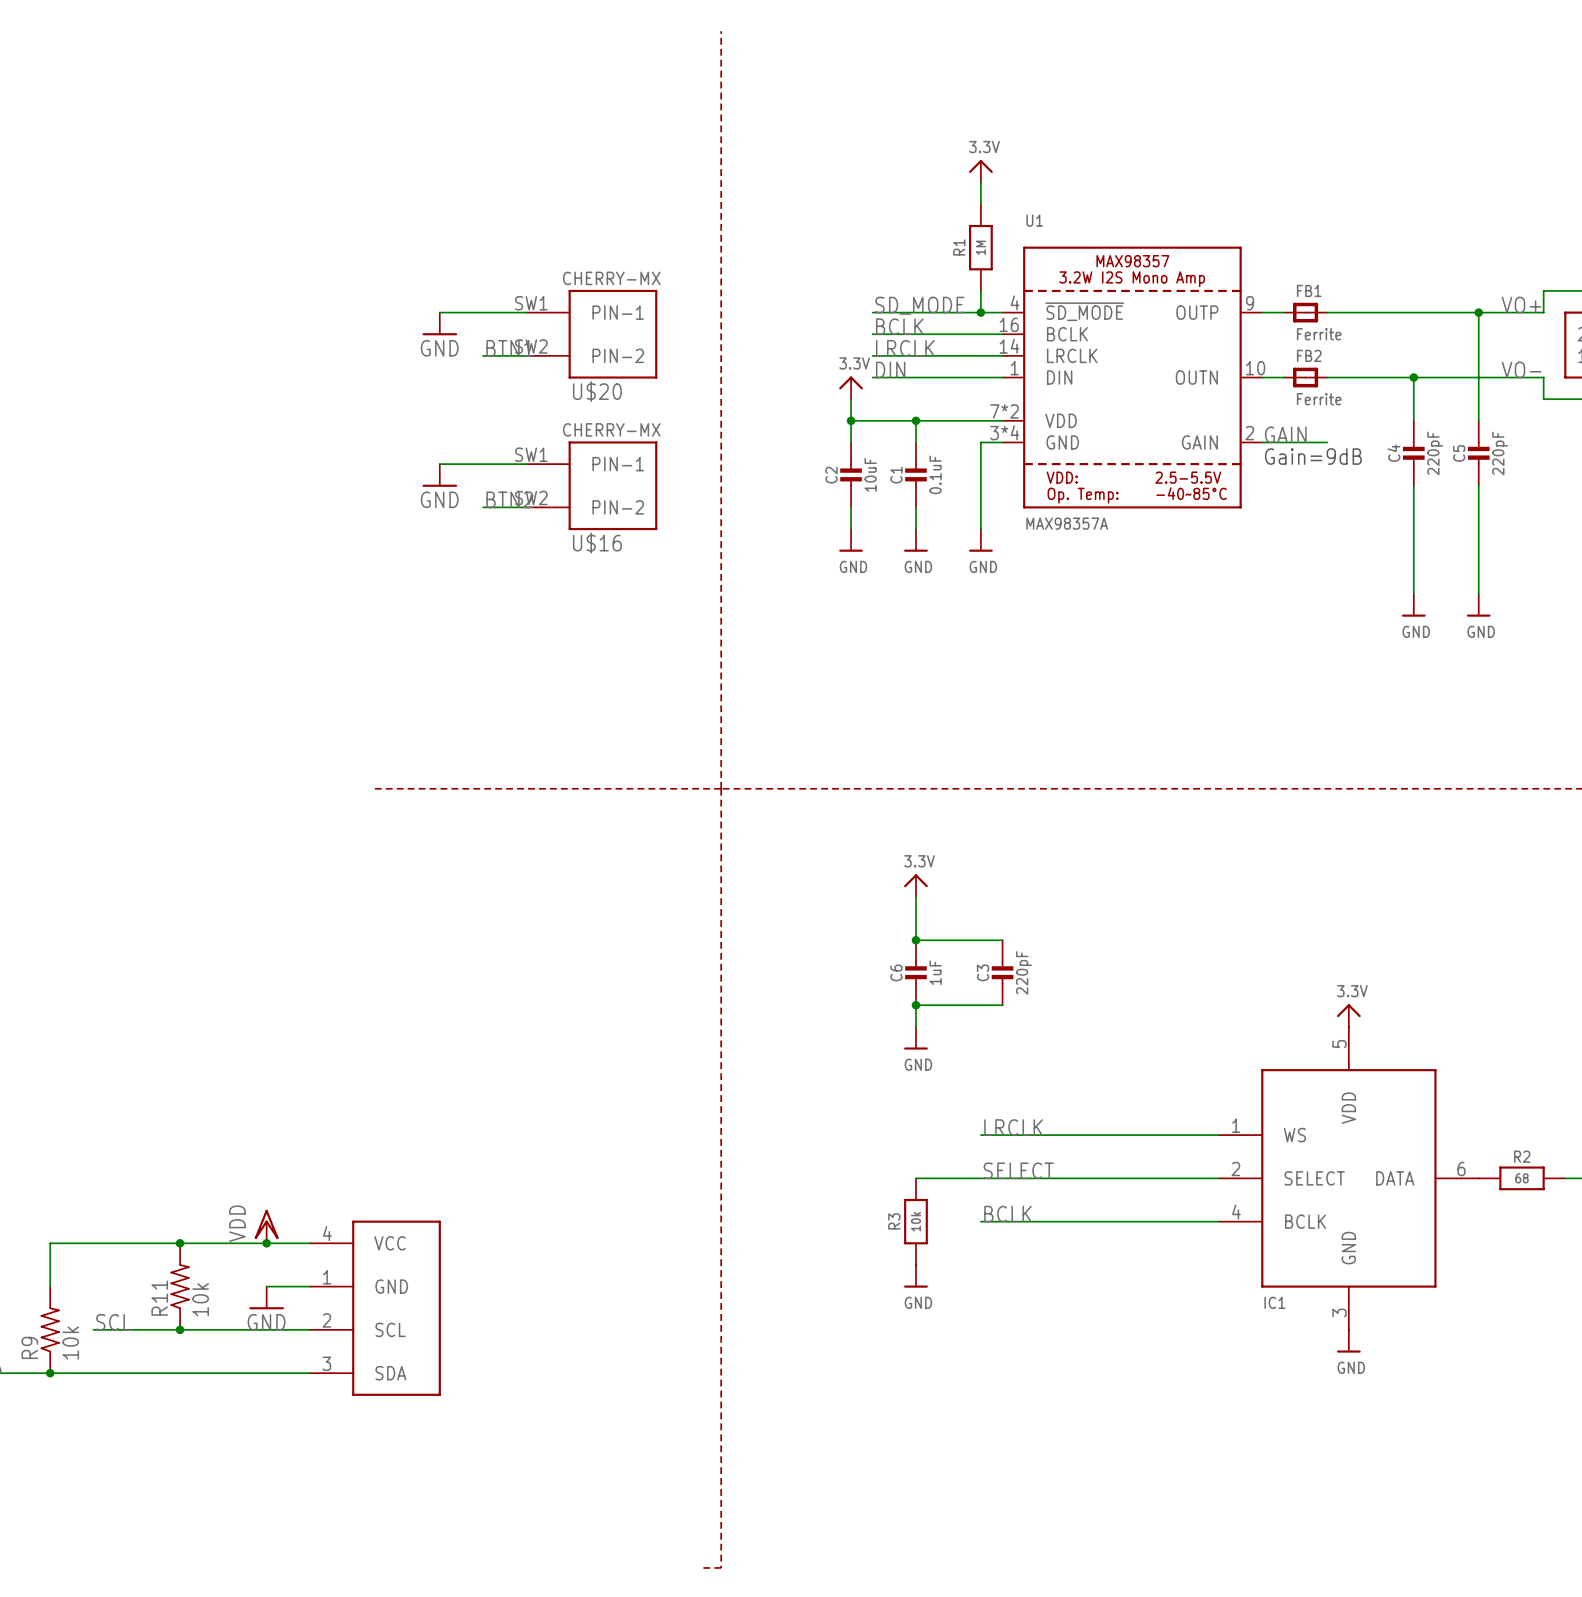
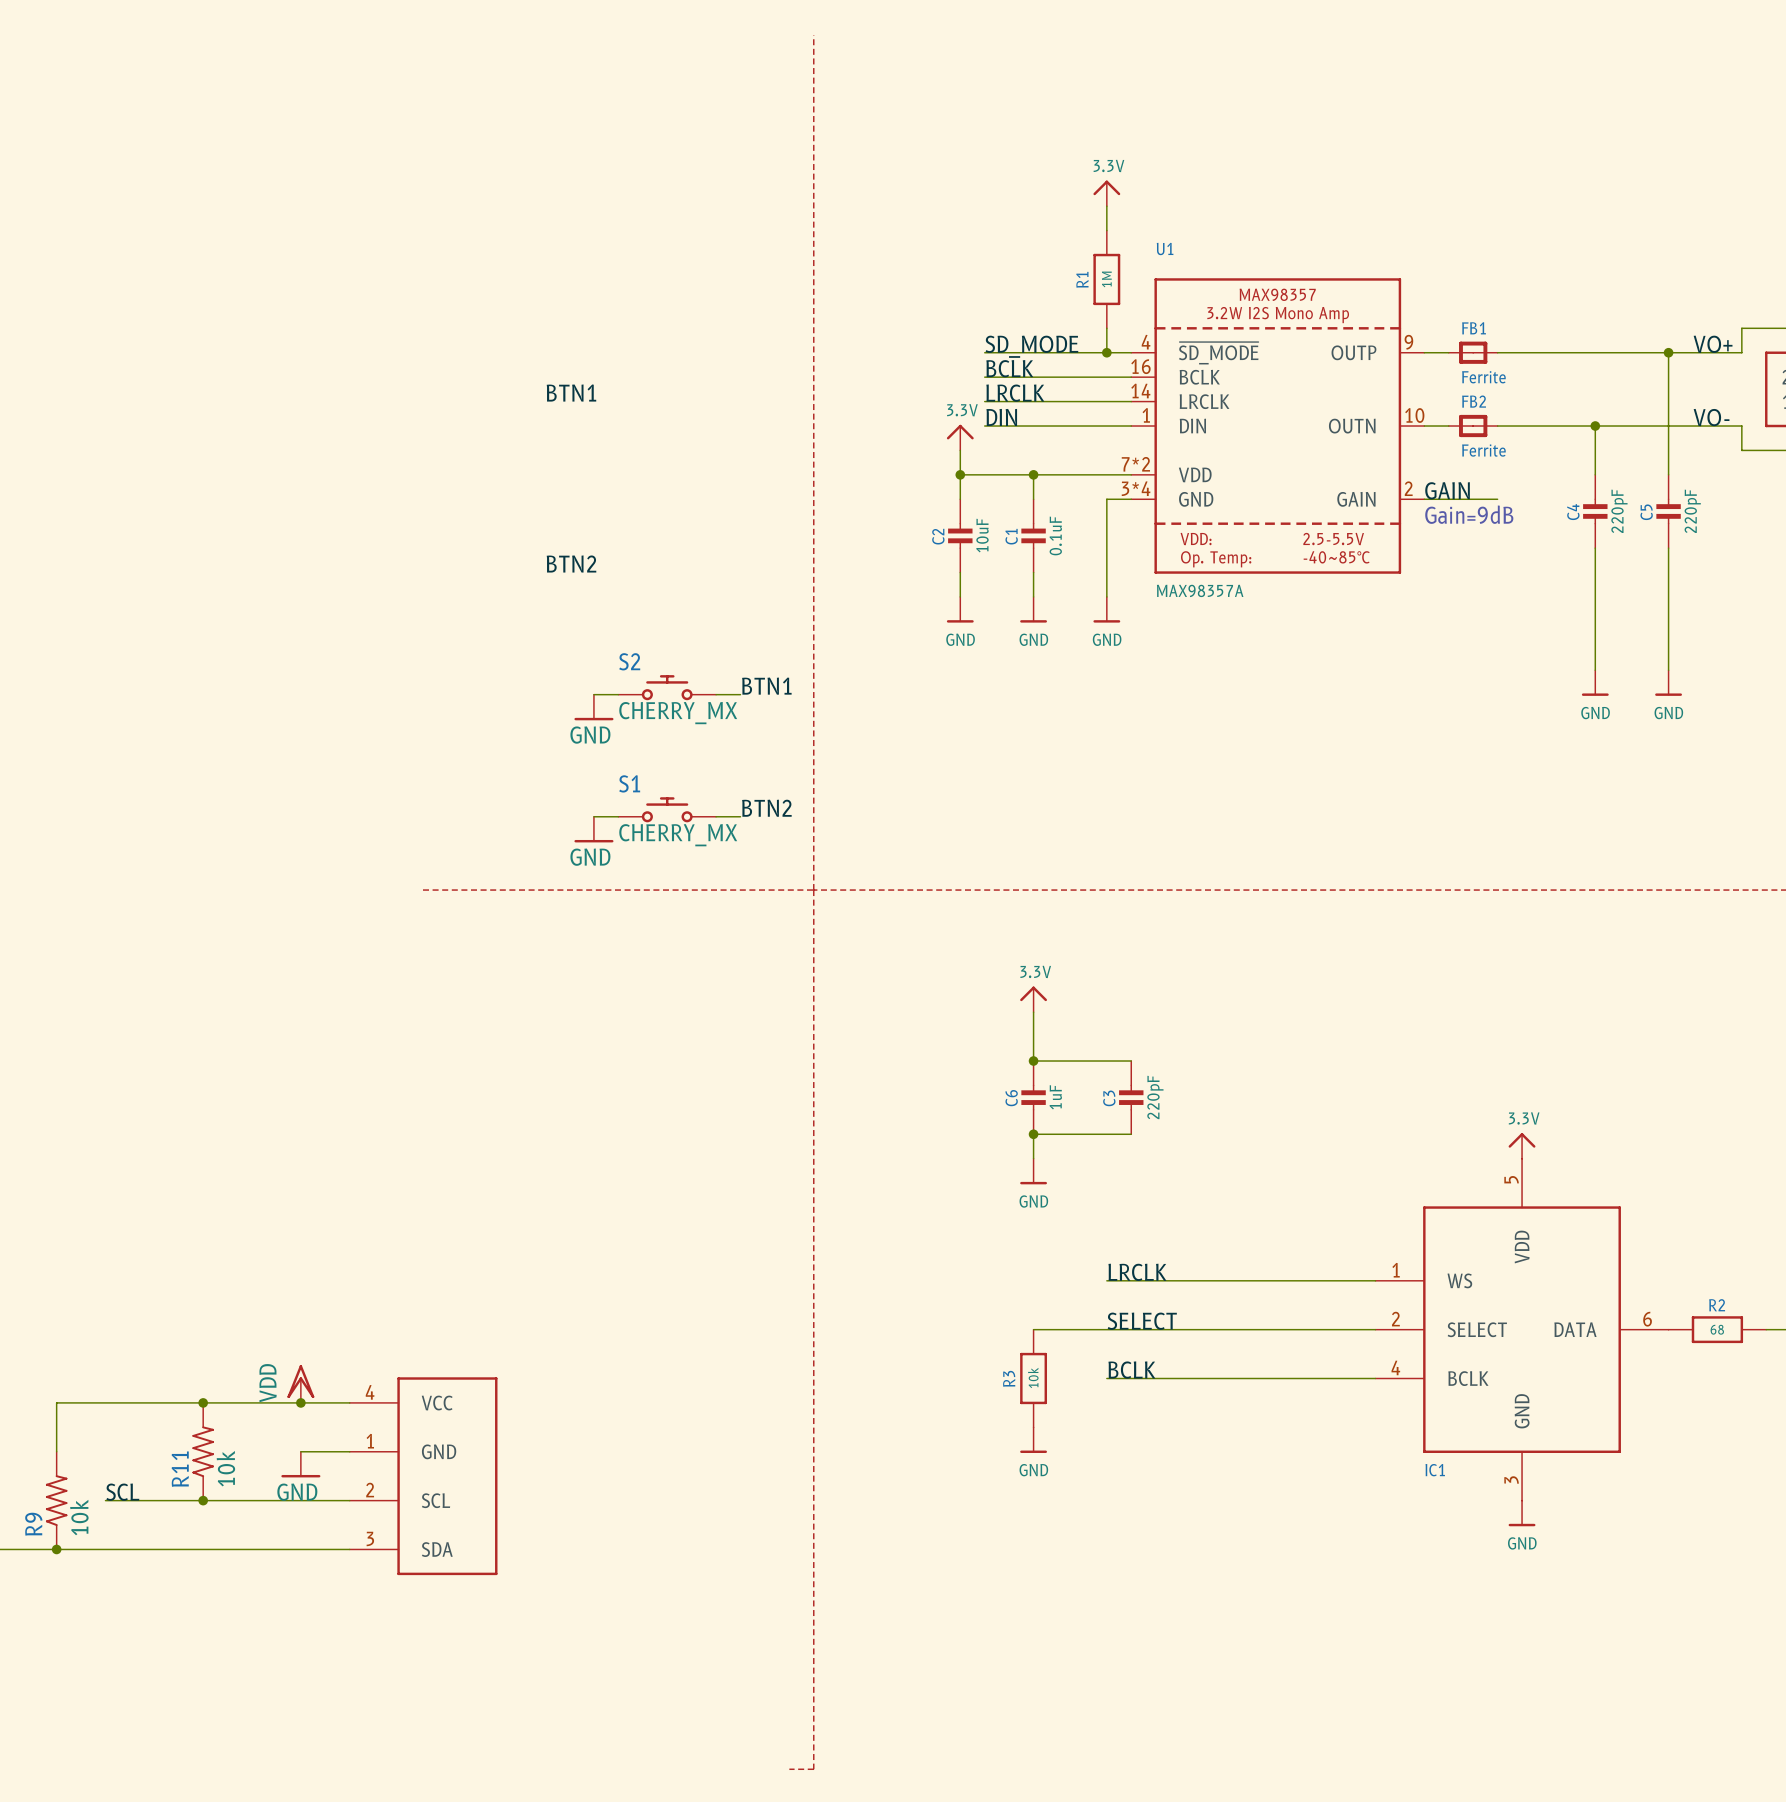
wire: (439, 312) (526, 312) -> none
power symbol: GND (439, 323) -> none
U$20: (591, 334) -> none
wire: (483, 355) (526, 355) -> none
wire: (439, 464) (526, 464) -> none
power symbol: GND (439, 475) -> none
U$16: (591, 485) -> none
wire: (483, 507) (526, 507) -> none
label: none -> BTN1 (766, 686)
S2: none -> CHERRY_MX (667, 687)
wire: none -> (593, 694) (618, 694)
wire: none -> (716, 694) (740, 694)
power symbol: none -> GND (593, 707)
label: none -> BTN2 (766, 808)
S1: none -> CHERRY_MX (667, 809)
wire: none -> (593, 816) (618, 816)
wire: none -> (716, 816) (740, 816)
power symbol: none -> GND (593, 829)

